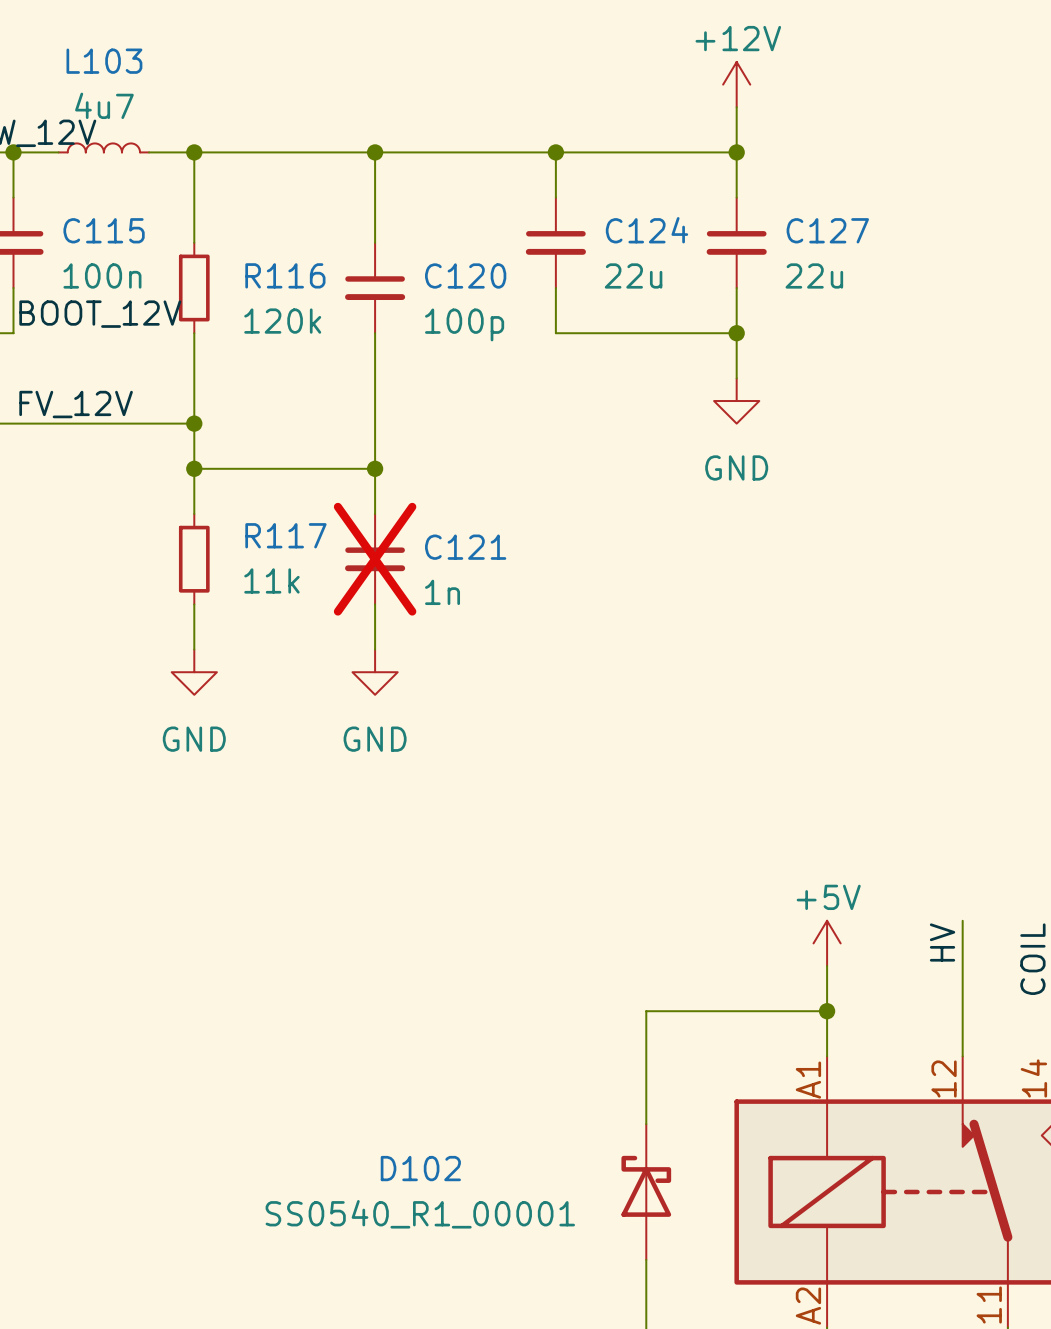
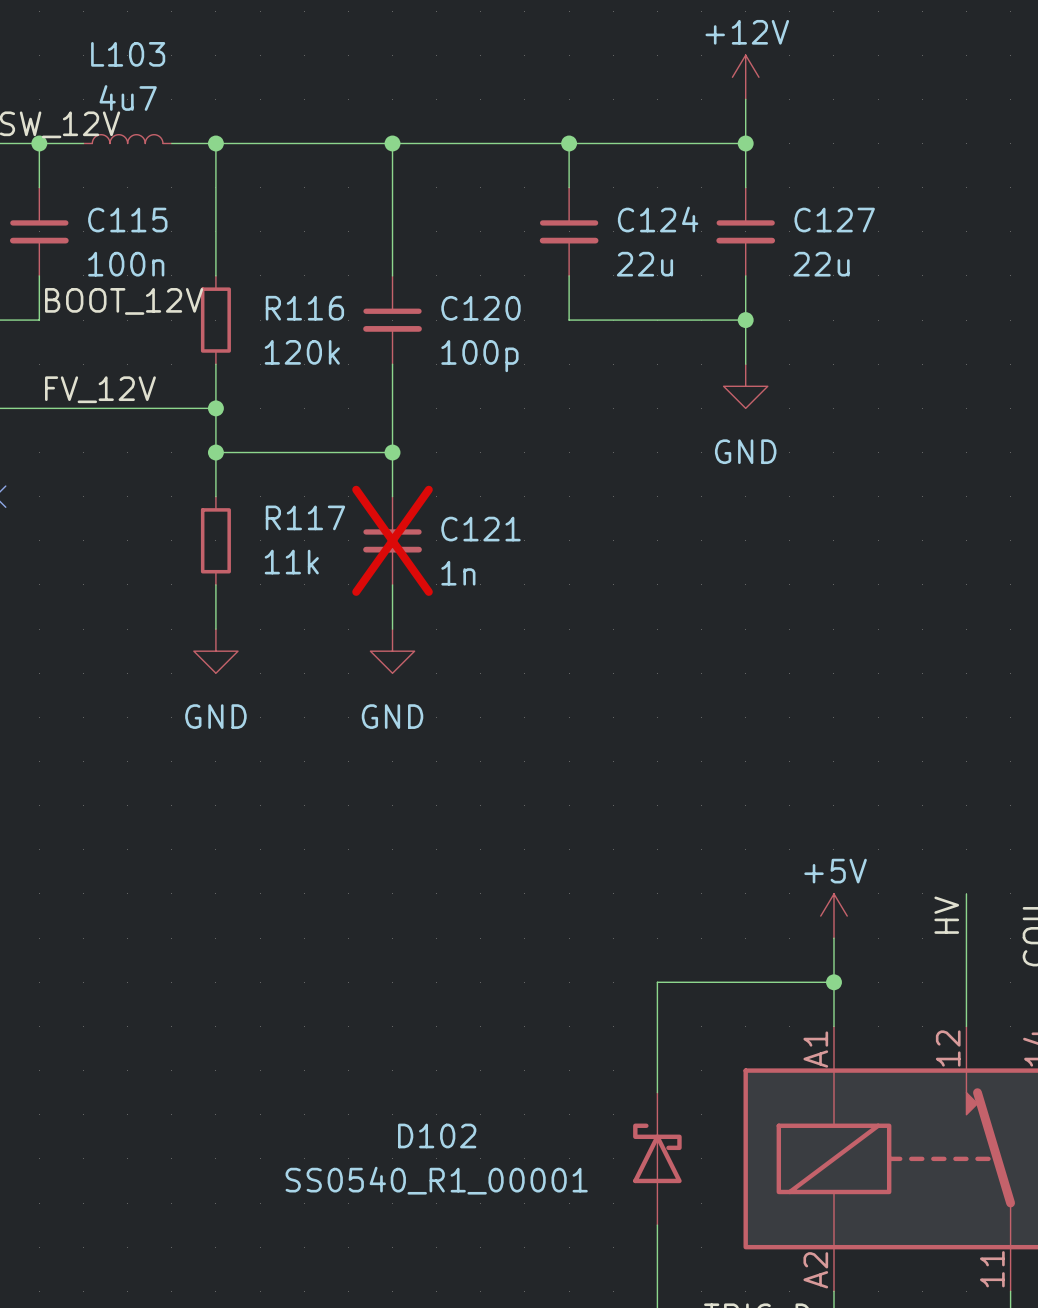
R116 position: (194, 288) -> (215, 320)
C120 position: (375, 288) -> (392, 320)
wire: (194, 333) (194, 378) -> (215, 231) (215, 275)

